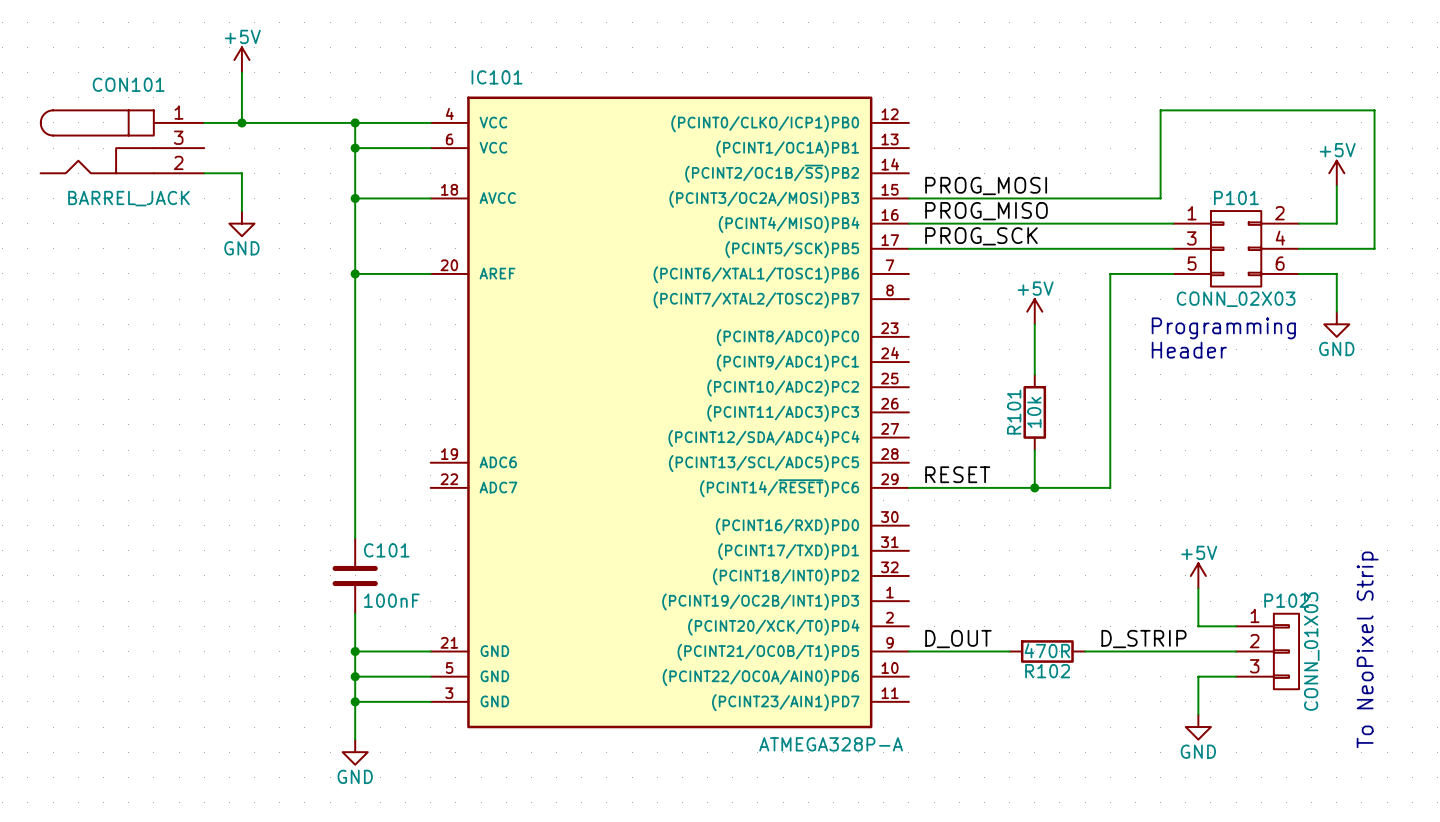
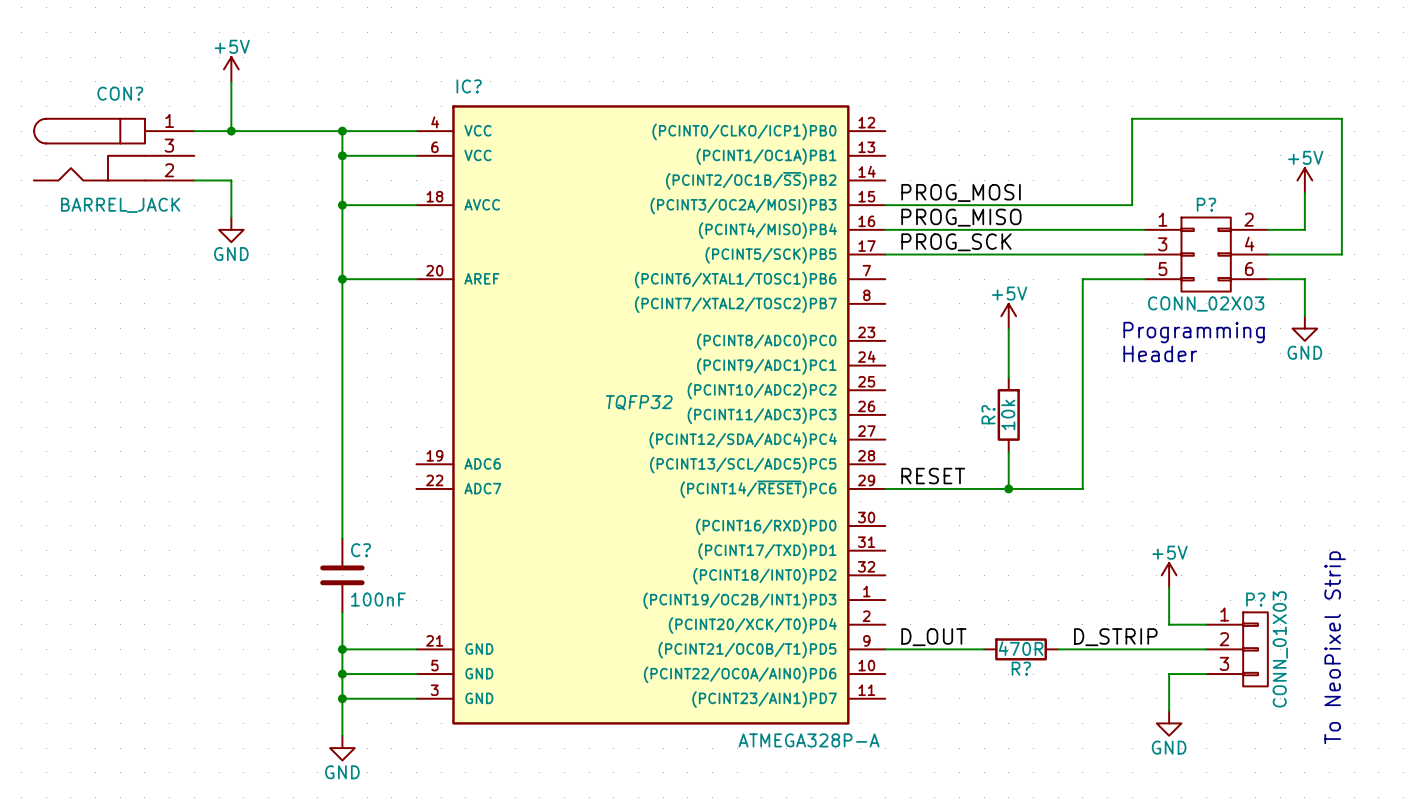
IC101 name: IC101 (497, 77) -> IC? (469, 86)
CON101 name: CON101 (128, 84) -> CON? (120, 93)
P101 name: P101 (1236, 197) -> P? (1206, 204)
IC101 text: none -> TQFP32 (639, 402)
R101 name: R101 (1014, 412) -> R? (988, 414)
C101 name: C101 (386, 550) -> C? (361, 550)
P102 name: P102 (1286, 600) -> P? (1255, 599)
R102 name: R102 (1047, 671) -> R? (1021, 668)

